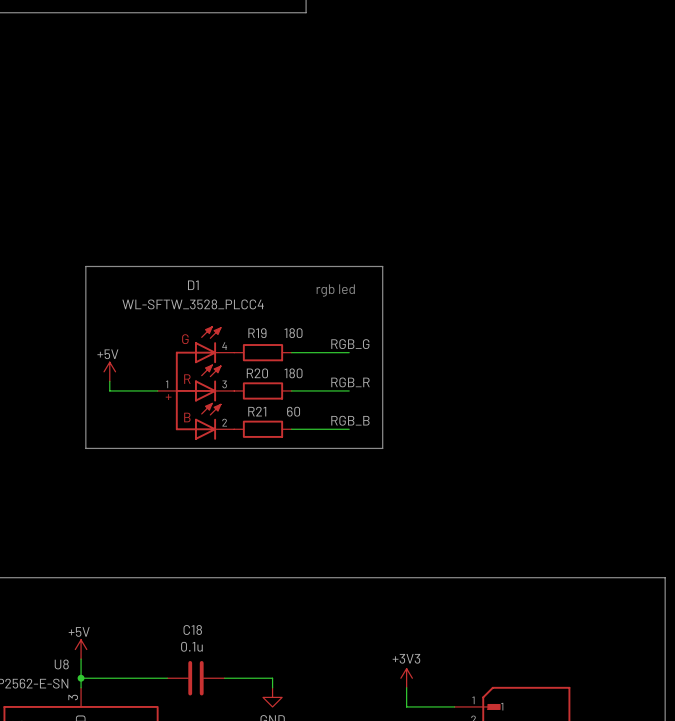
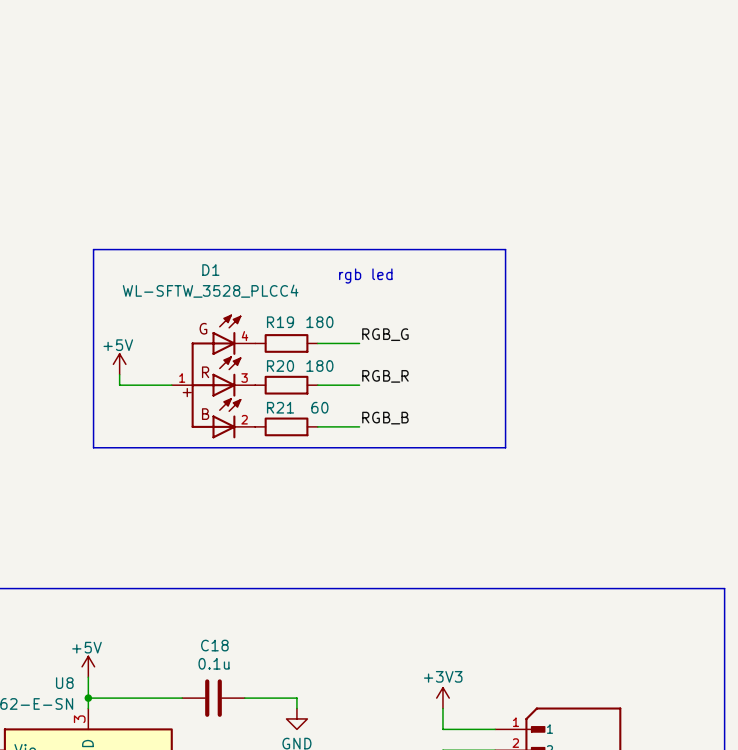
line: (382, 266) (382, 448) -> (416, 249) (505, 249) (505, 447) (416, 447)
wire: (330, 352) (349, 352) -> none
wire: (330, 390) (349, 390) -> none
wire: (330, 429) (349, 429) -> none

